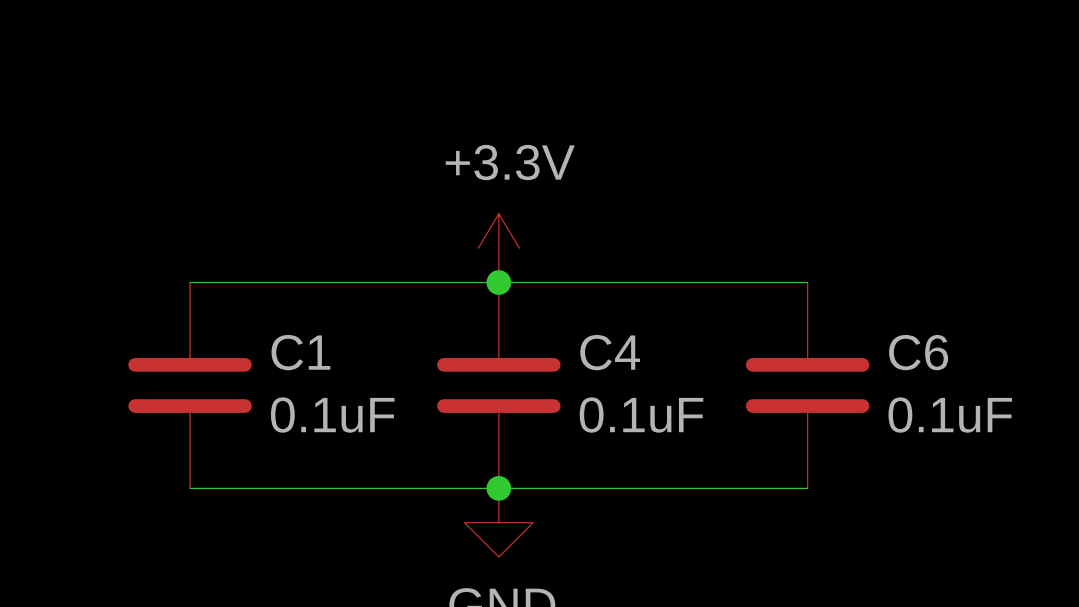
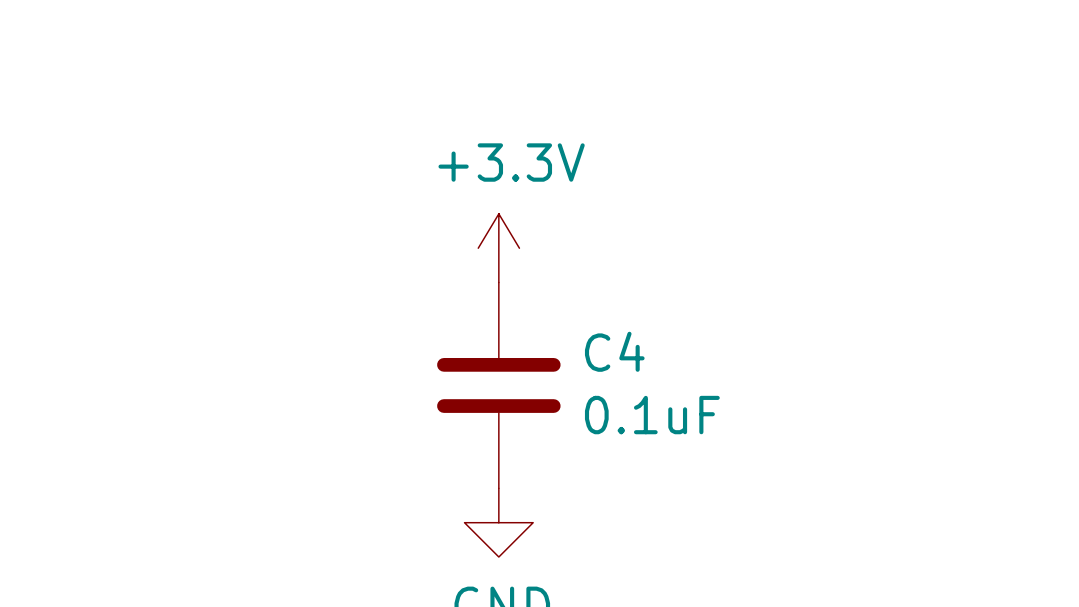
wire: (190, 282) (807, 282) -> none
junction: (498, 282) -> none
C1: 0.1uF (190, 385) -> none
C6: 0.1uF (807, 385) -> none
wire: (190, 488) (807, 488) -> none
junction: (498, 488) -> none

